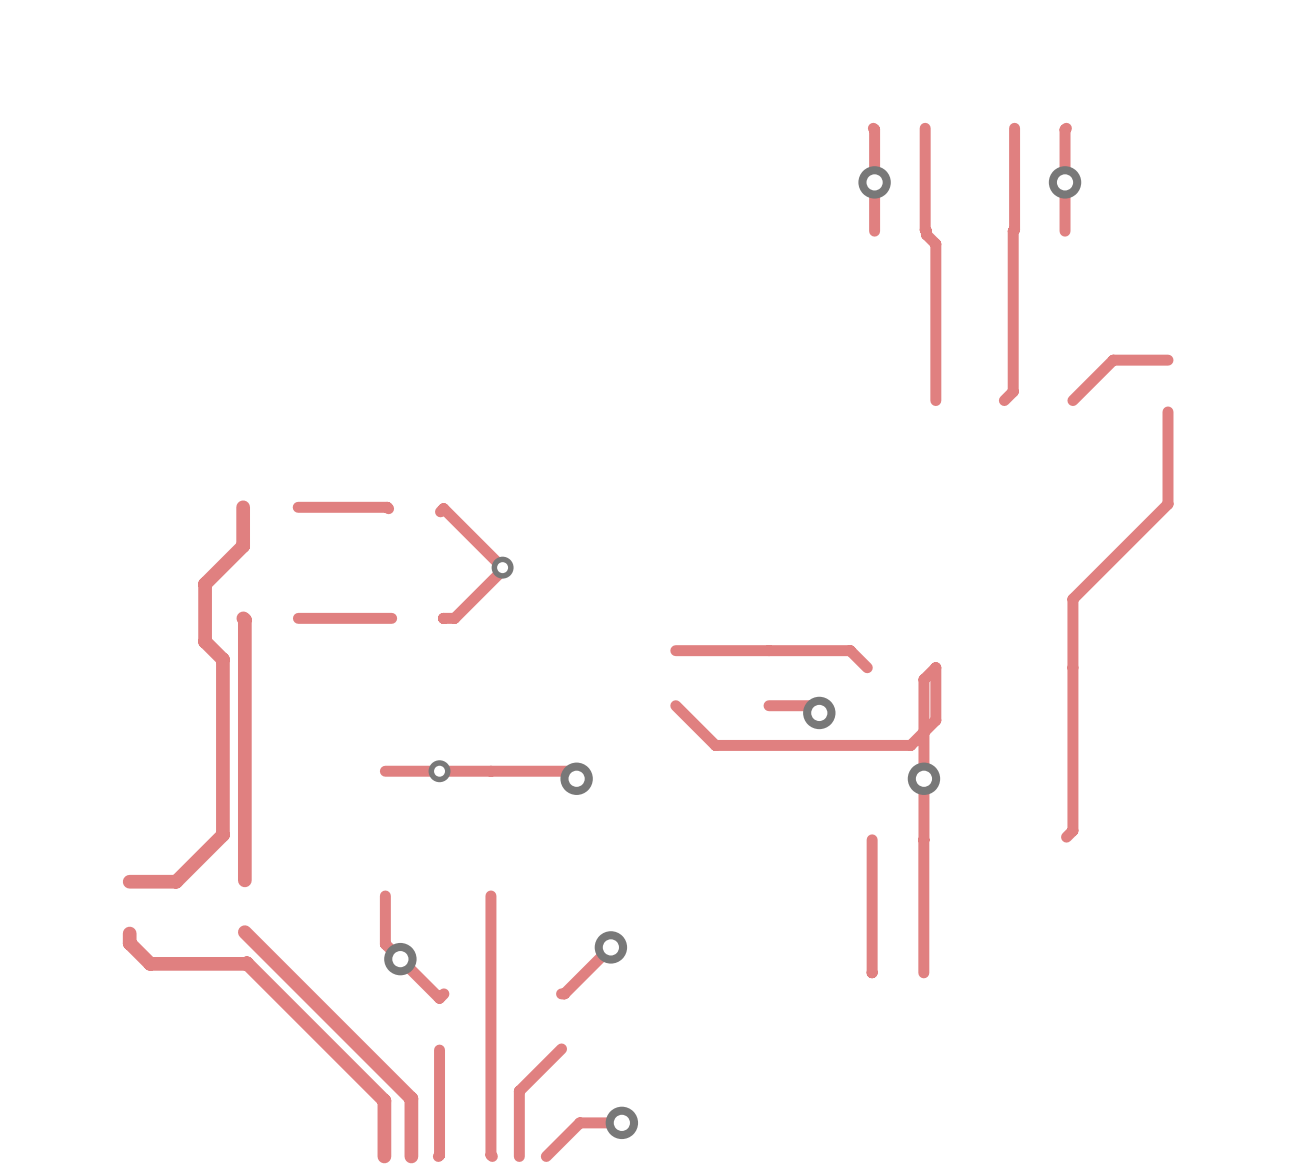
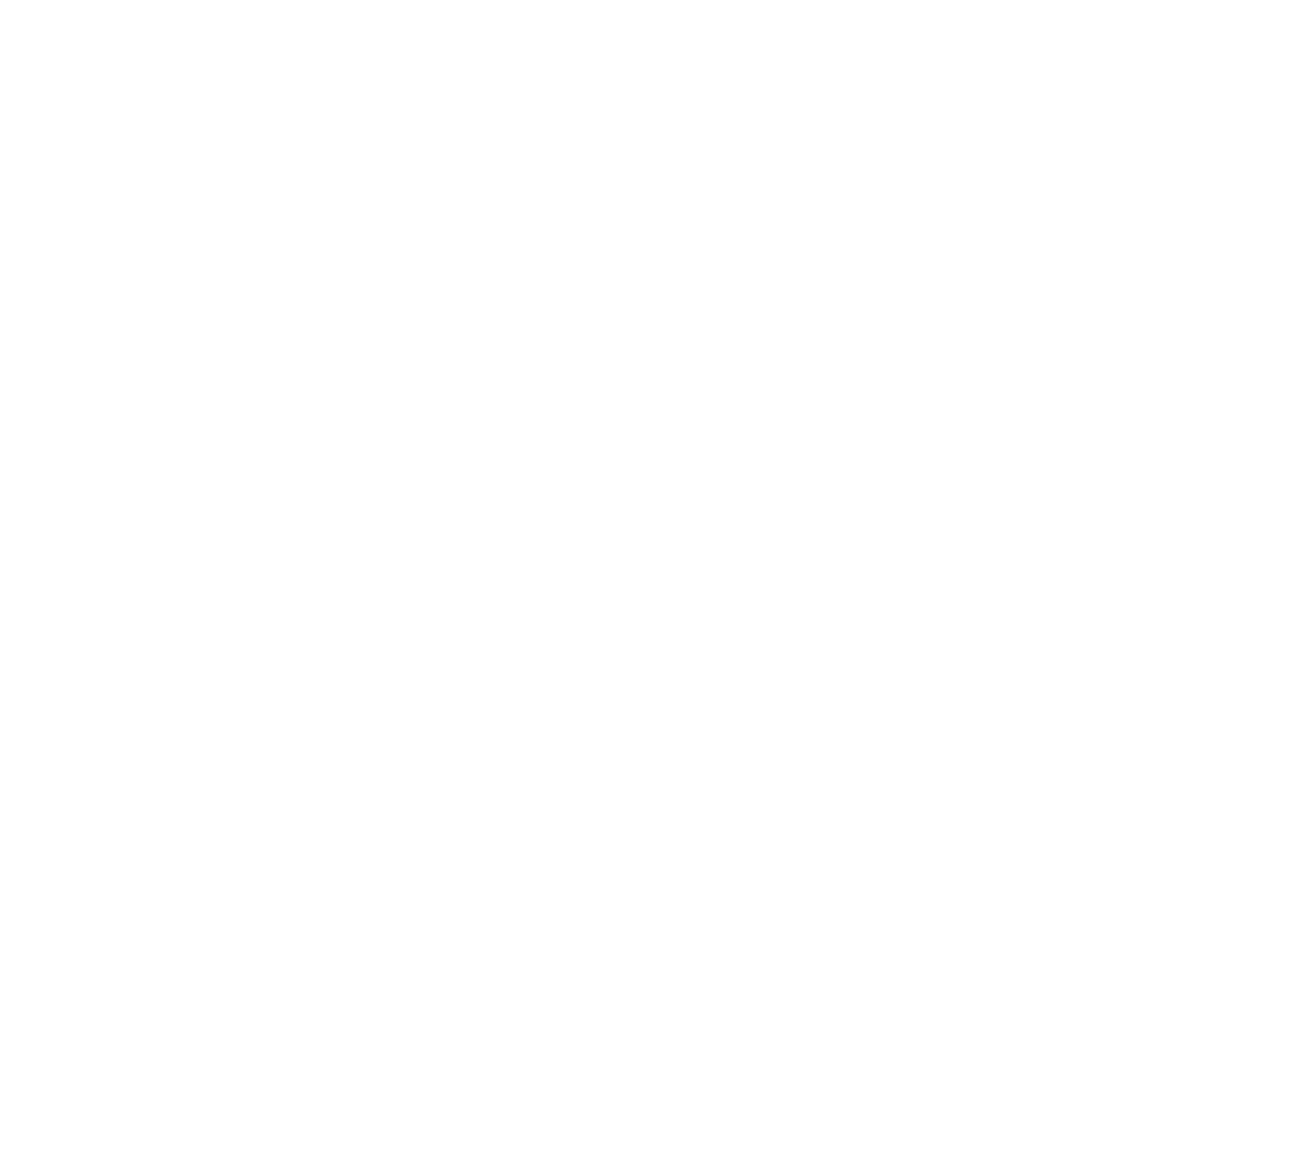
track: (873, 128) (874, 231) -> none
track: (925, 128) (925, 229) (926, 234) (935, 244) (935, 400) -> none
track: (1014, 128) (1013, 391) (1004, 400) -> none
track: (1066, 128) (1065, 231) -> none
via: (874, 182) -> none
via: (1065, 182) -> none
track: (1167, 360) (1113, 360) (1072, 400) -> none
track: (1167, 411) (1167, 504) (1072, 599) (1072, 830) (1066, 837) -> none
track: (243, 507) (243, 546) (205, 584) (205, 641) (222, 659) (222, 834) (176, 881) (129, 881) -> none
track: (298, 507) (388, 508) -> none
track: (440, 511) (443, 508) (503, 569) (454, 618) (443, 618) -> none
via: (502, 567) -> none
track: (243, 618) (244, 880) -> none
track: (298, 618) (391, 618) -> none
track: (675, 650) (850, 650) (867, 667) -> none
track: (675, 705) (715, 745) (910, 745) (935, 720) (935, 667) (923, 679) (923, 972) -> none
track: (769, 705) (812, 705) (819, 712) -> none
via: (819, 712) -> none
track: (385, 771) (569, 771) (576, 778) -> none
via: (439, 771) -> none
via: (576, 778) -> none
via: (923, 778) -> none
track: (872, 839) (872, 972) -> none
track: (385, 895) (385, 944) (439, 998) (443, 993) -> none
track: (490, 895) (492, 1156) -> none
track: (244, 932) (411, 1098) (411, 1156) -> none
track: (129, 933) (129, 943) (150, 963) (246, 963) -> none
track: (610, 947) (564, 993) (561, 993) -> none
via: (610, 947) -> none
via: (400, 959) -> none
track: (246, 963) (384, 1100) (384, 1156) -> none
track: (561, 1048) (519, 1091) (519, 1156) -> none
track: (439, 1050) (438, 1156) -> none
track: (621, 1122) (579, 1122) (546, 1156) -> none
via: (621, 1122) -> none

